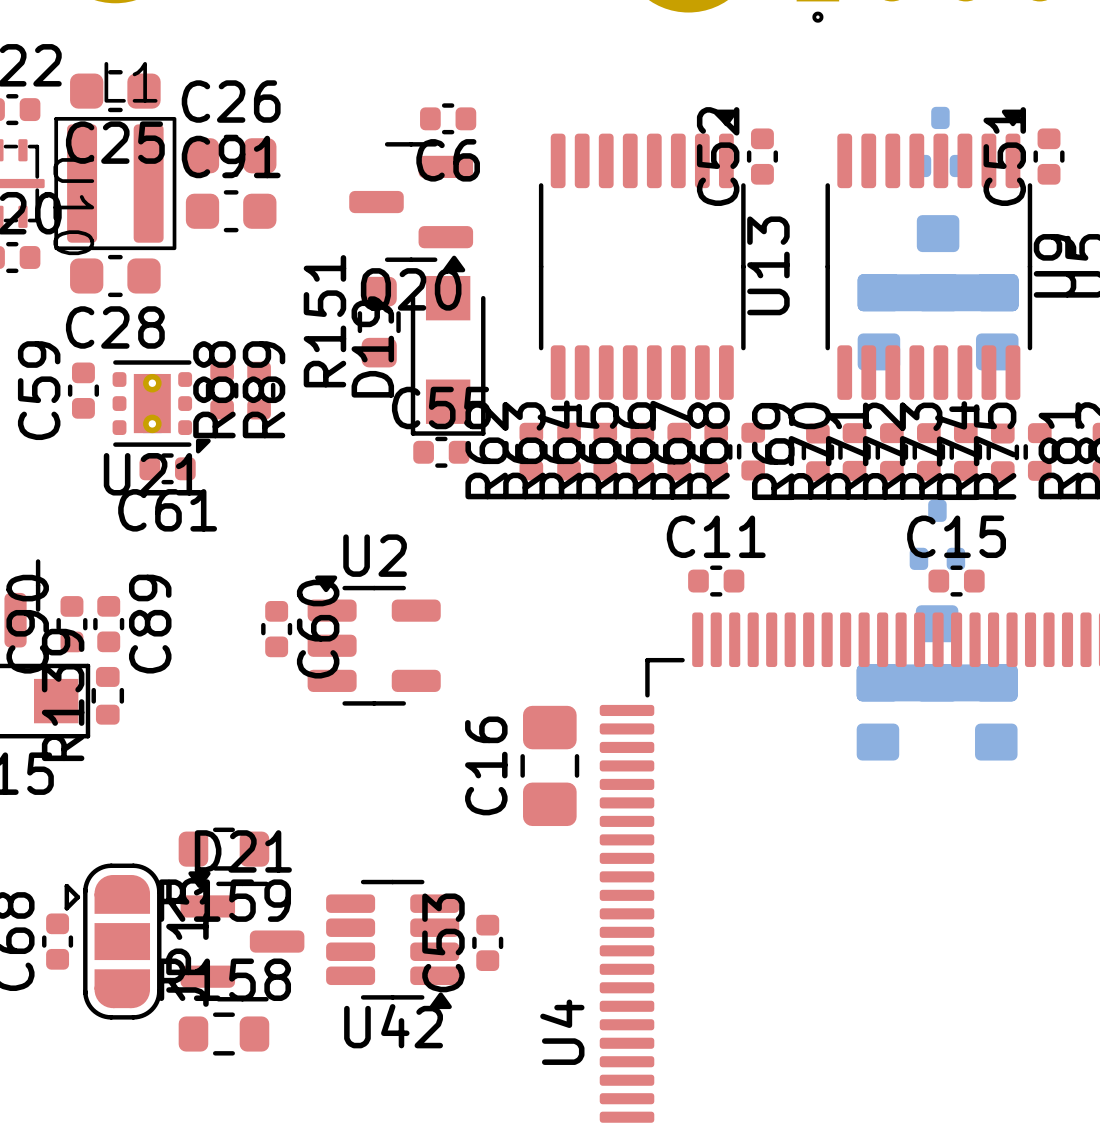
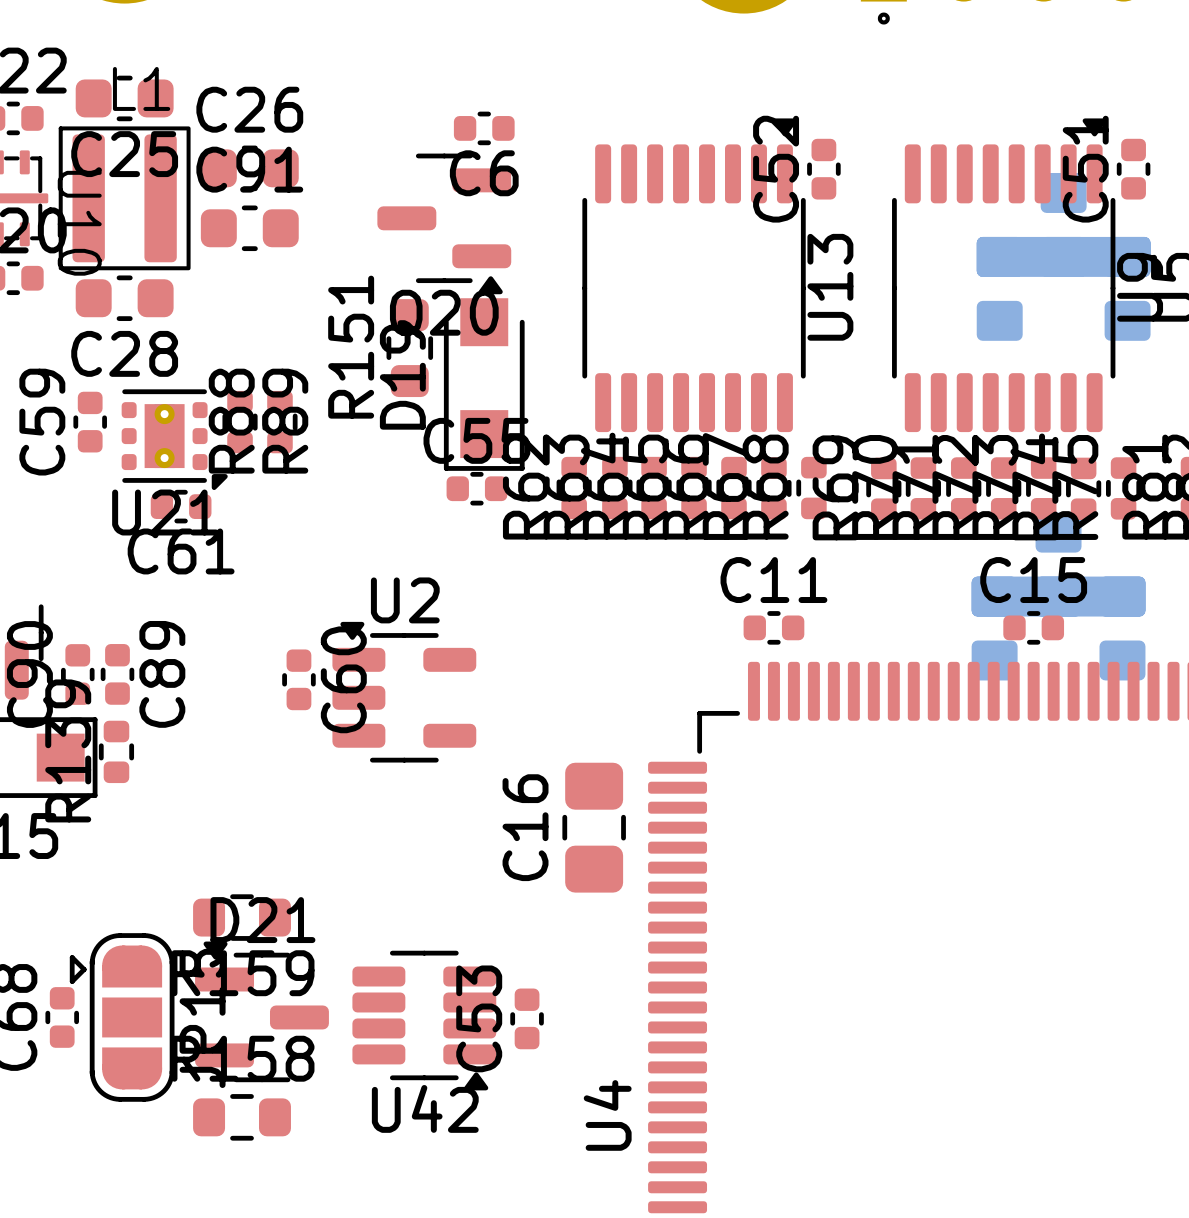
part: (940, 141) -> none
part position: (938, 292) -> (1063, 256)
part: (937, 534) -> none
part: none -> (1058, 596)
part: (937, 682) -> none

